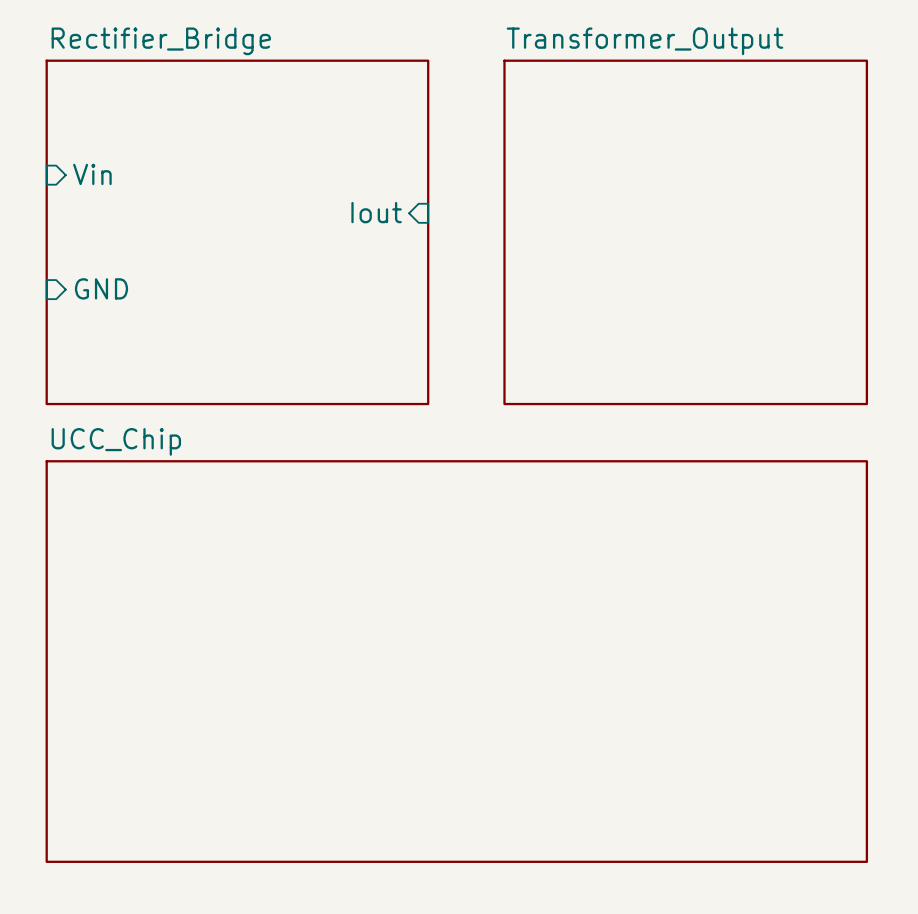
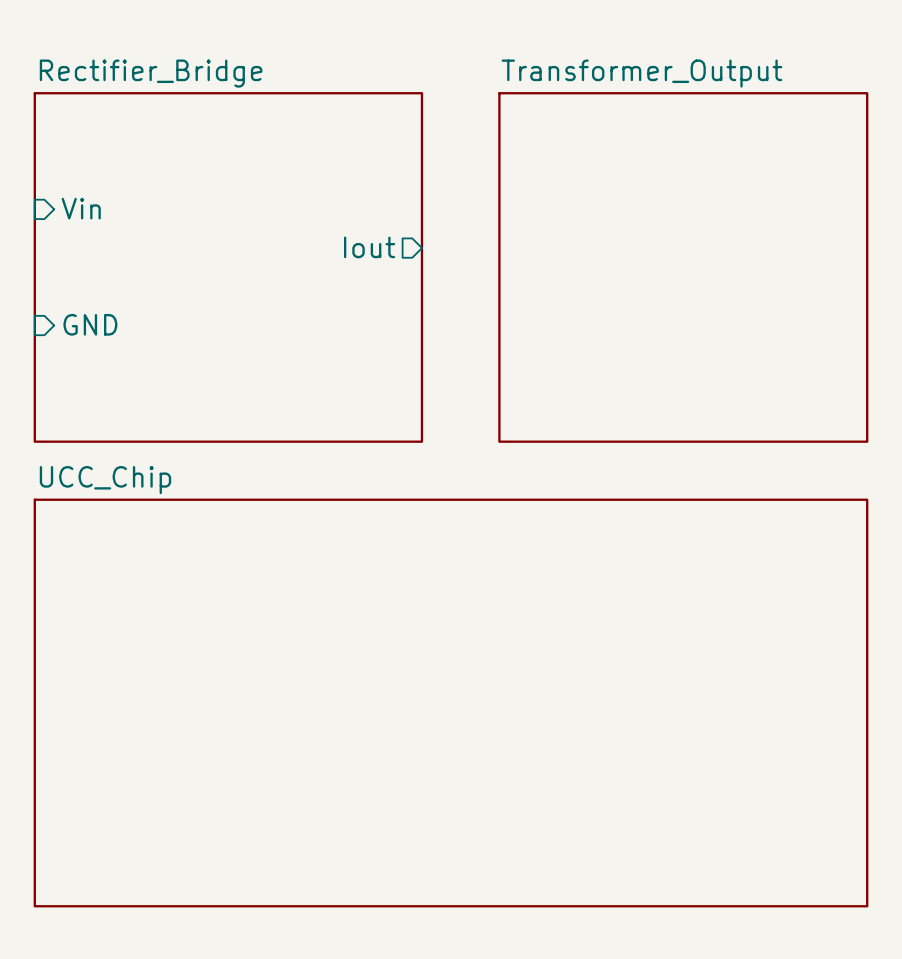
sheet pin shape: input (376, 212) -> output (369, 247)

